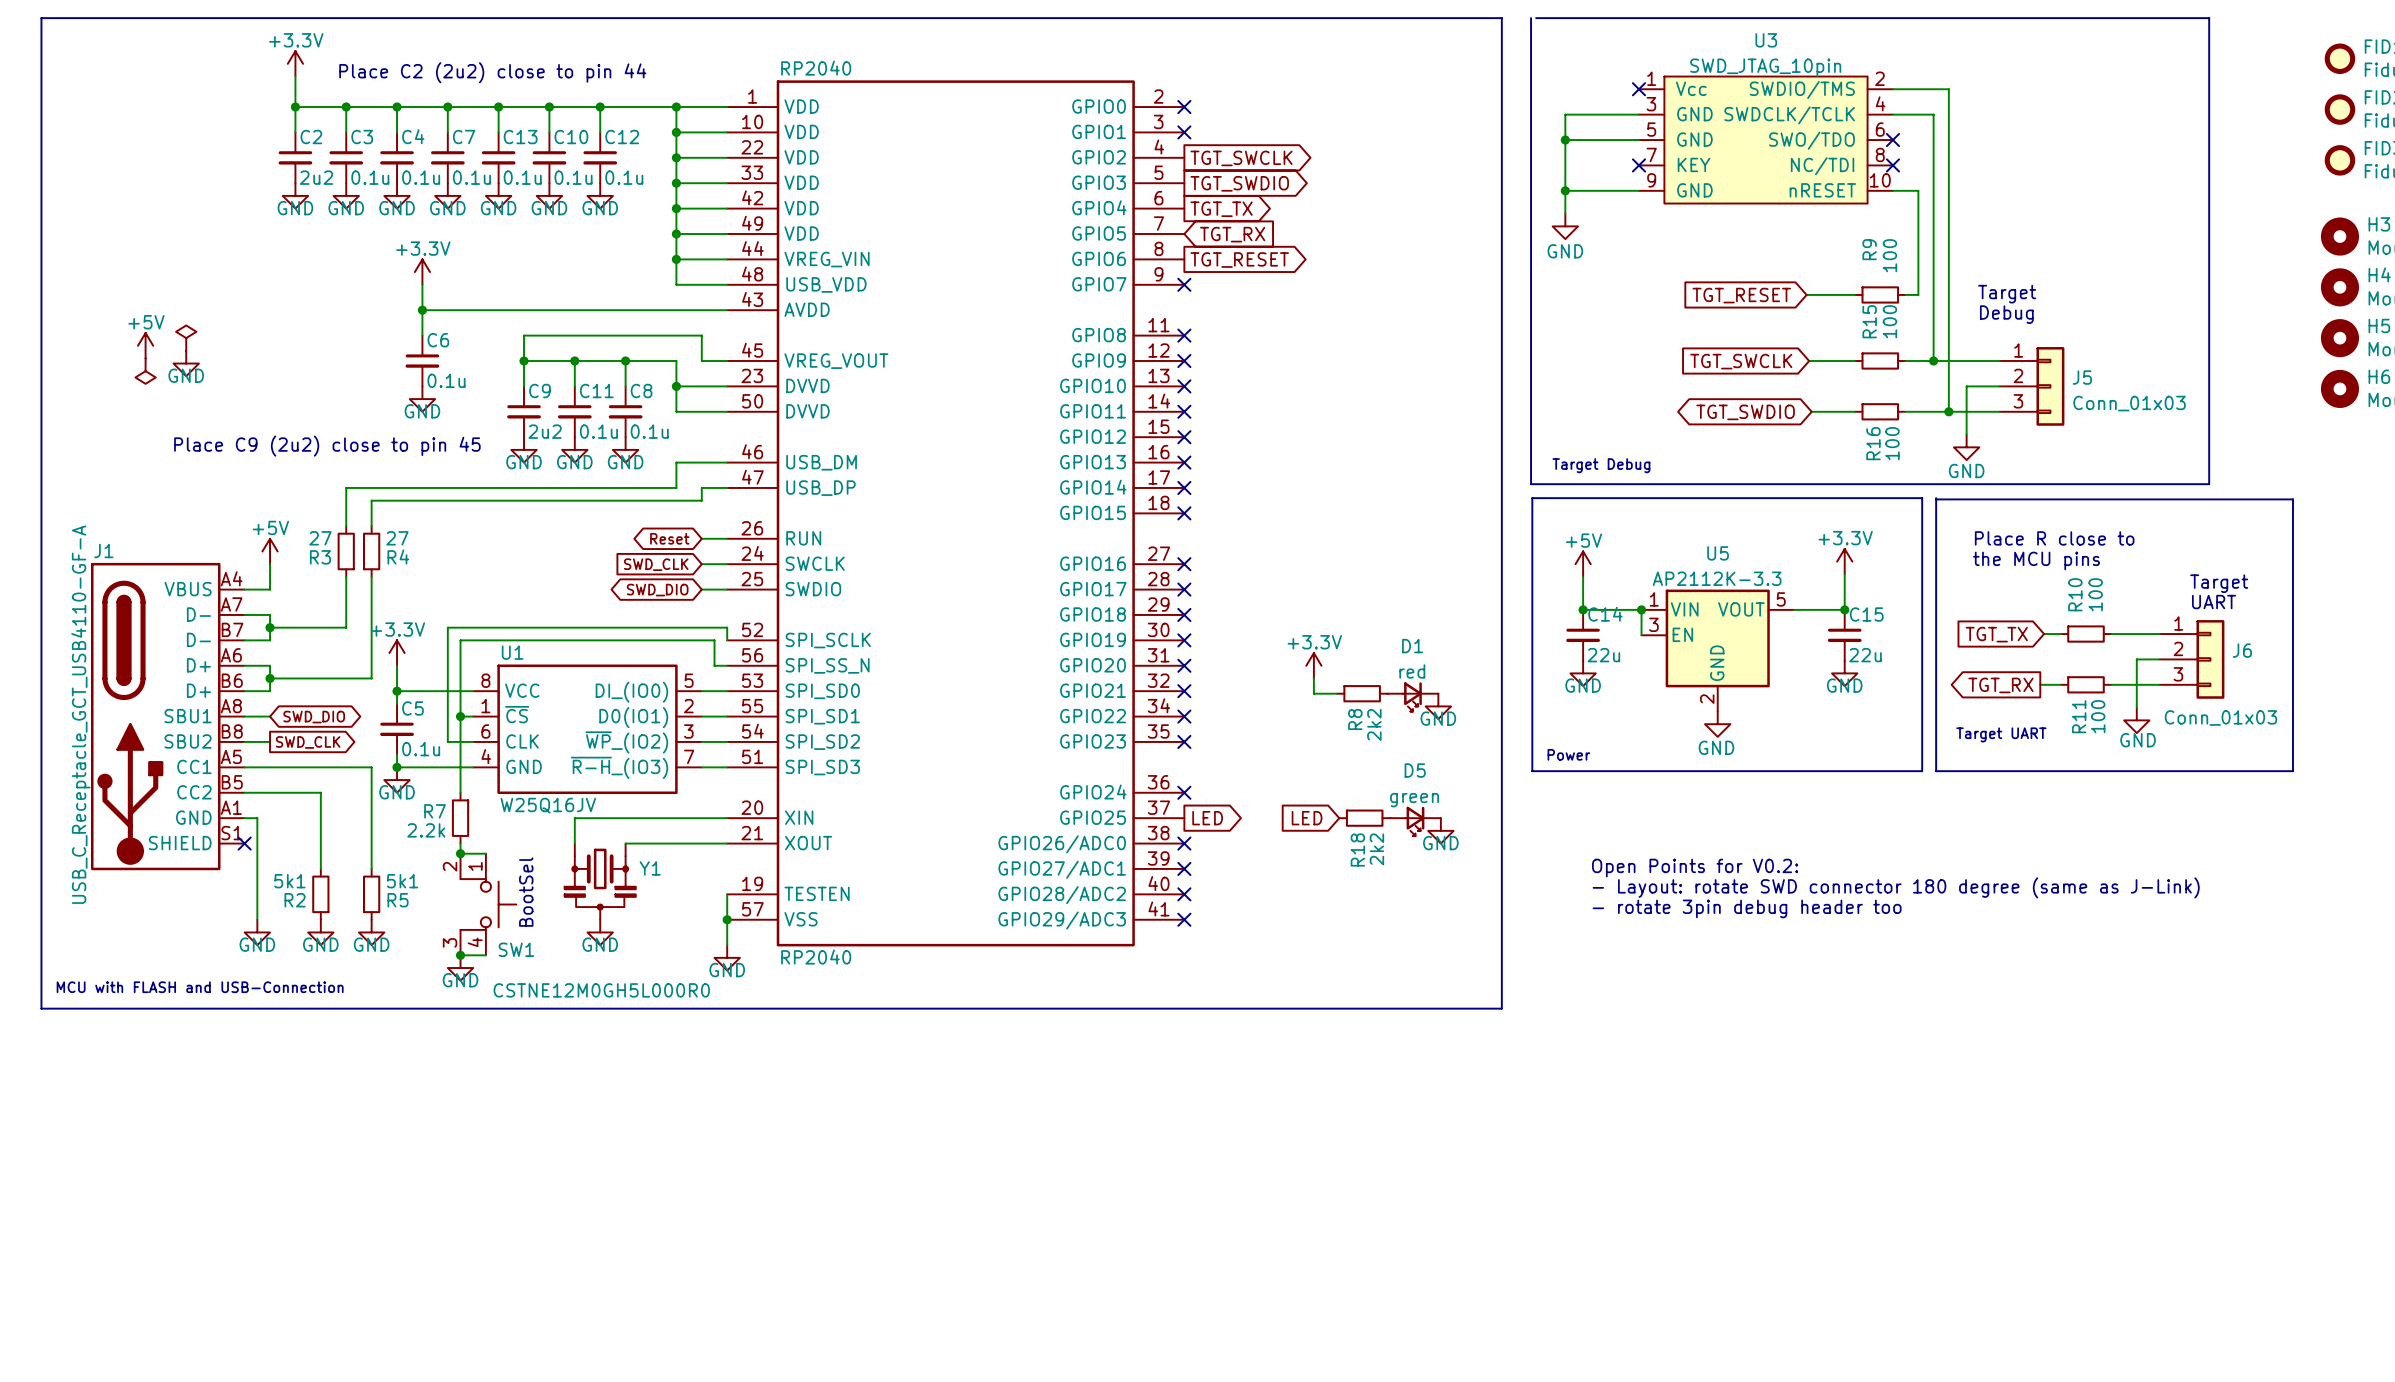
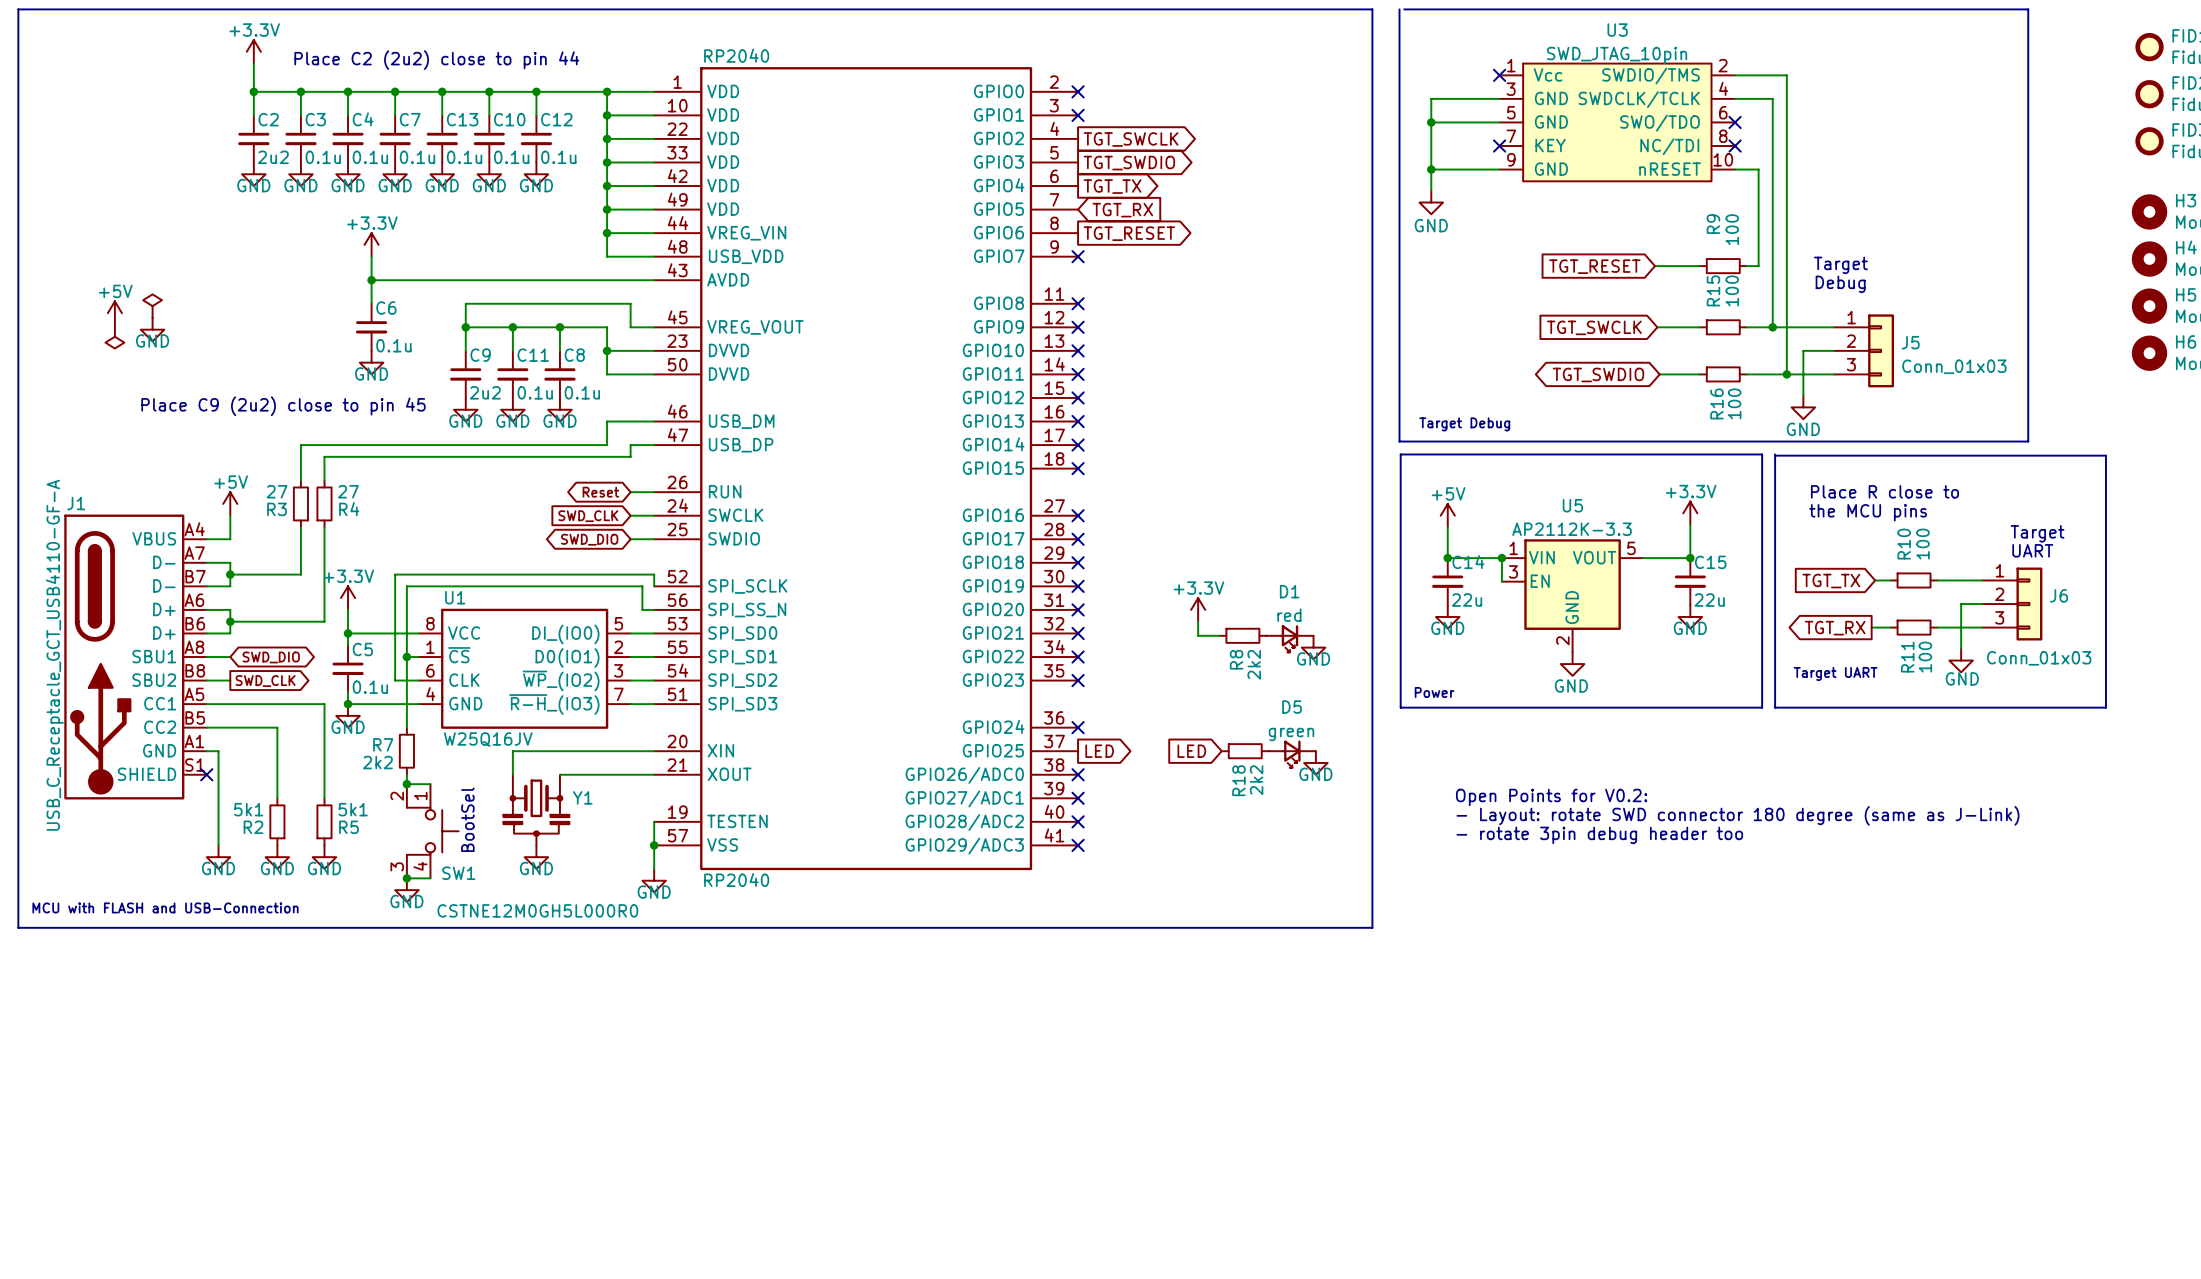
R7 value: 2.2k (426, 830) -> 2k2 (377, 762)

